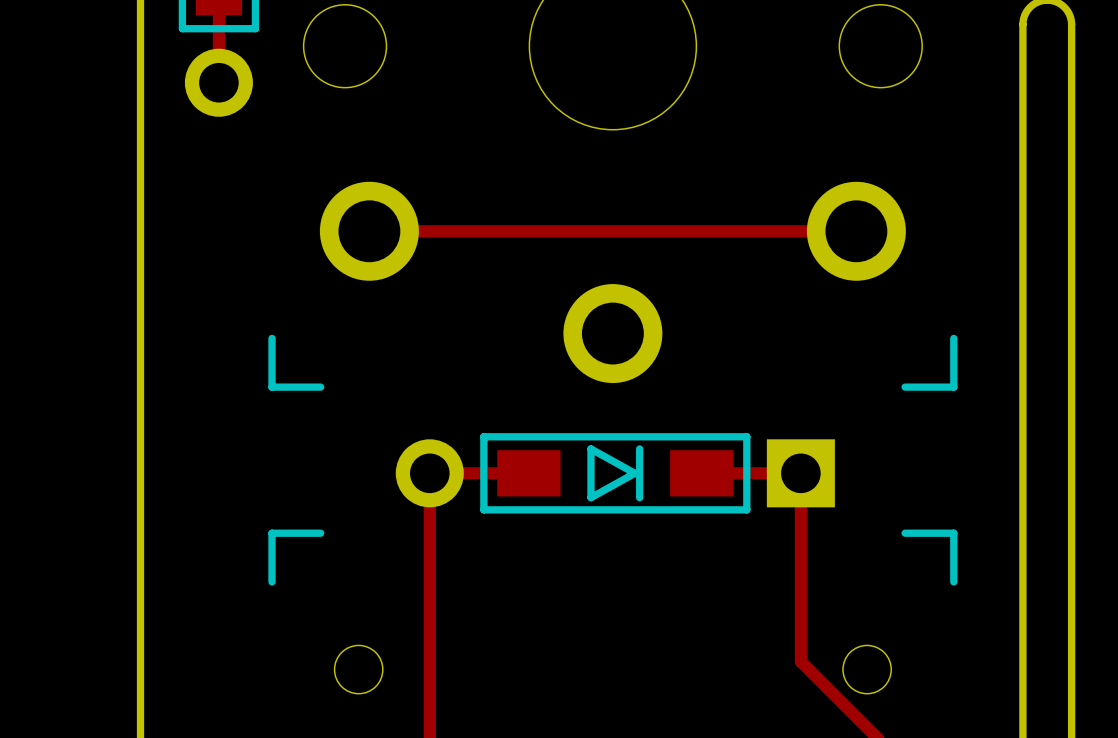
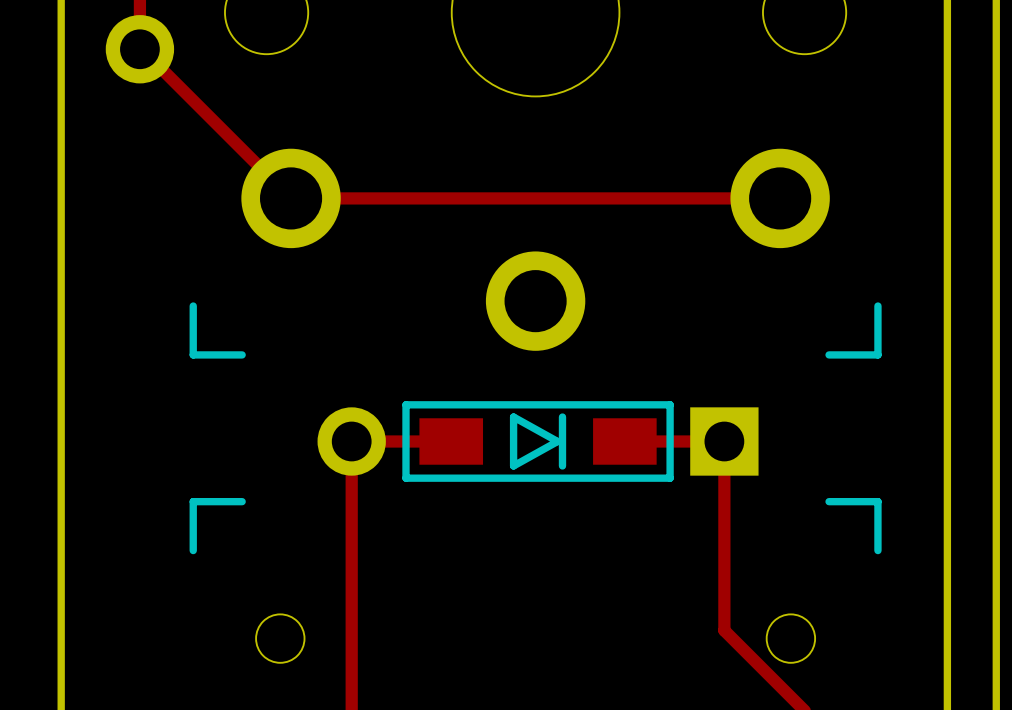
track: none -> (139, 49) (291, 198)

